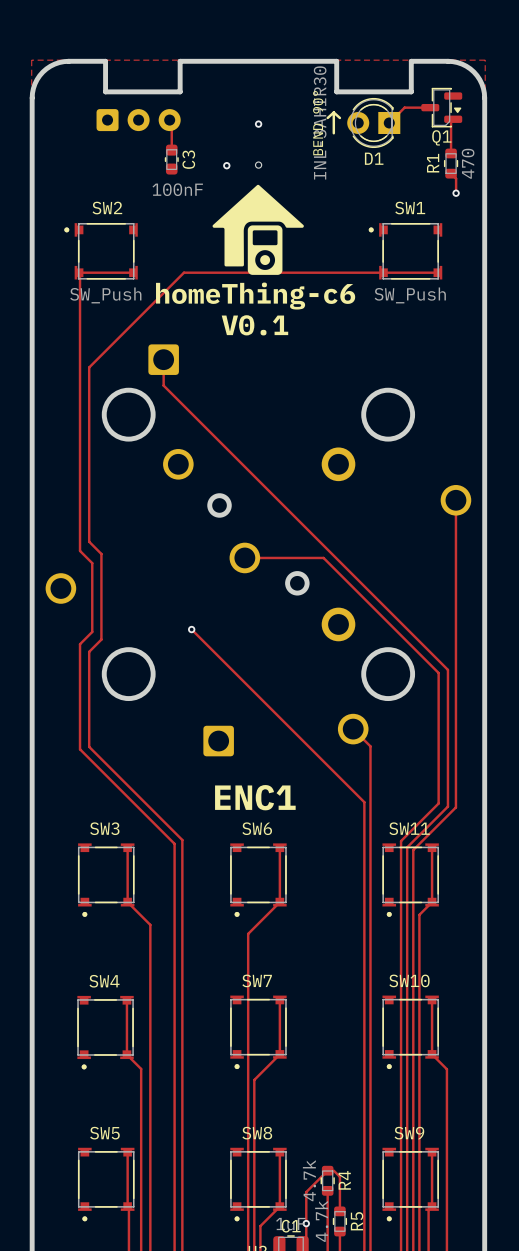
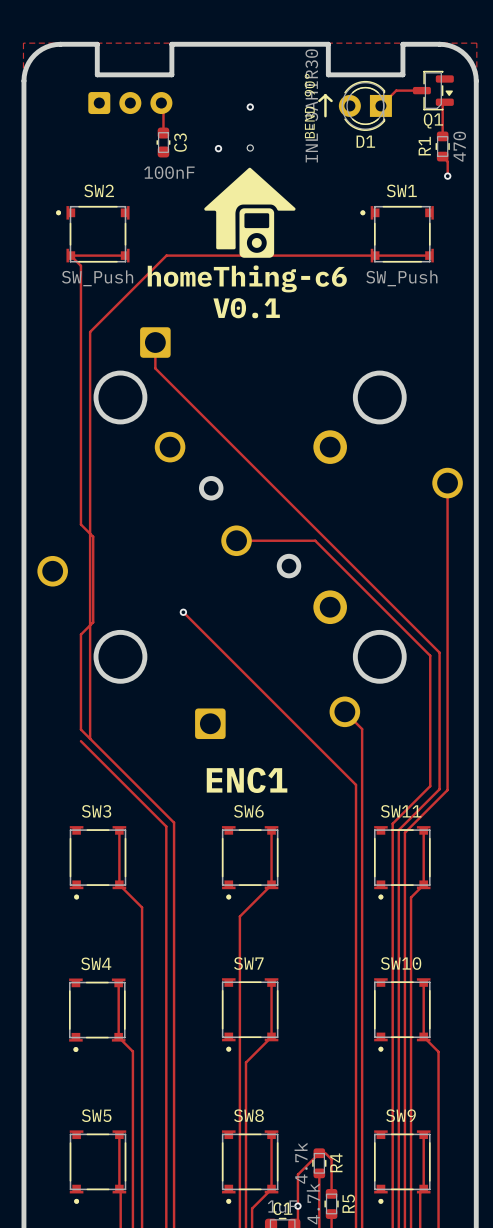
track: (183, 272) (89, 367) -> (71, 256) (80, 265) (80, 350)
track: none -> (175, 255) (166, 255) (90, 332) (90, 738)
track: (80, 273) (80, 550) (92, 563) (92, 631) (80, 644) (80, 749) (89, 758) -> none

